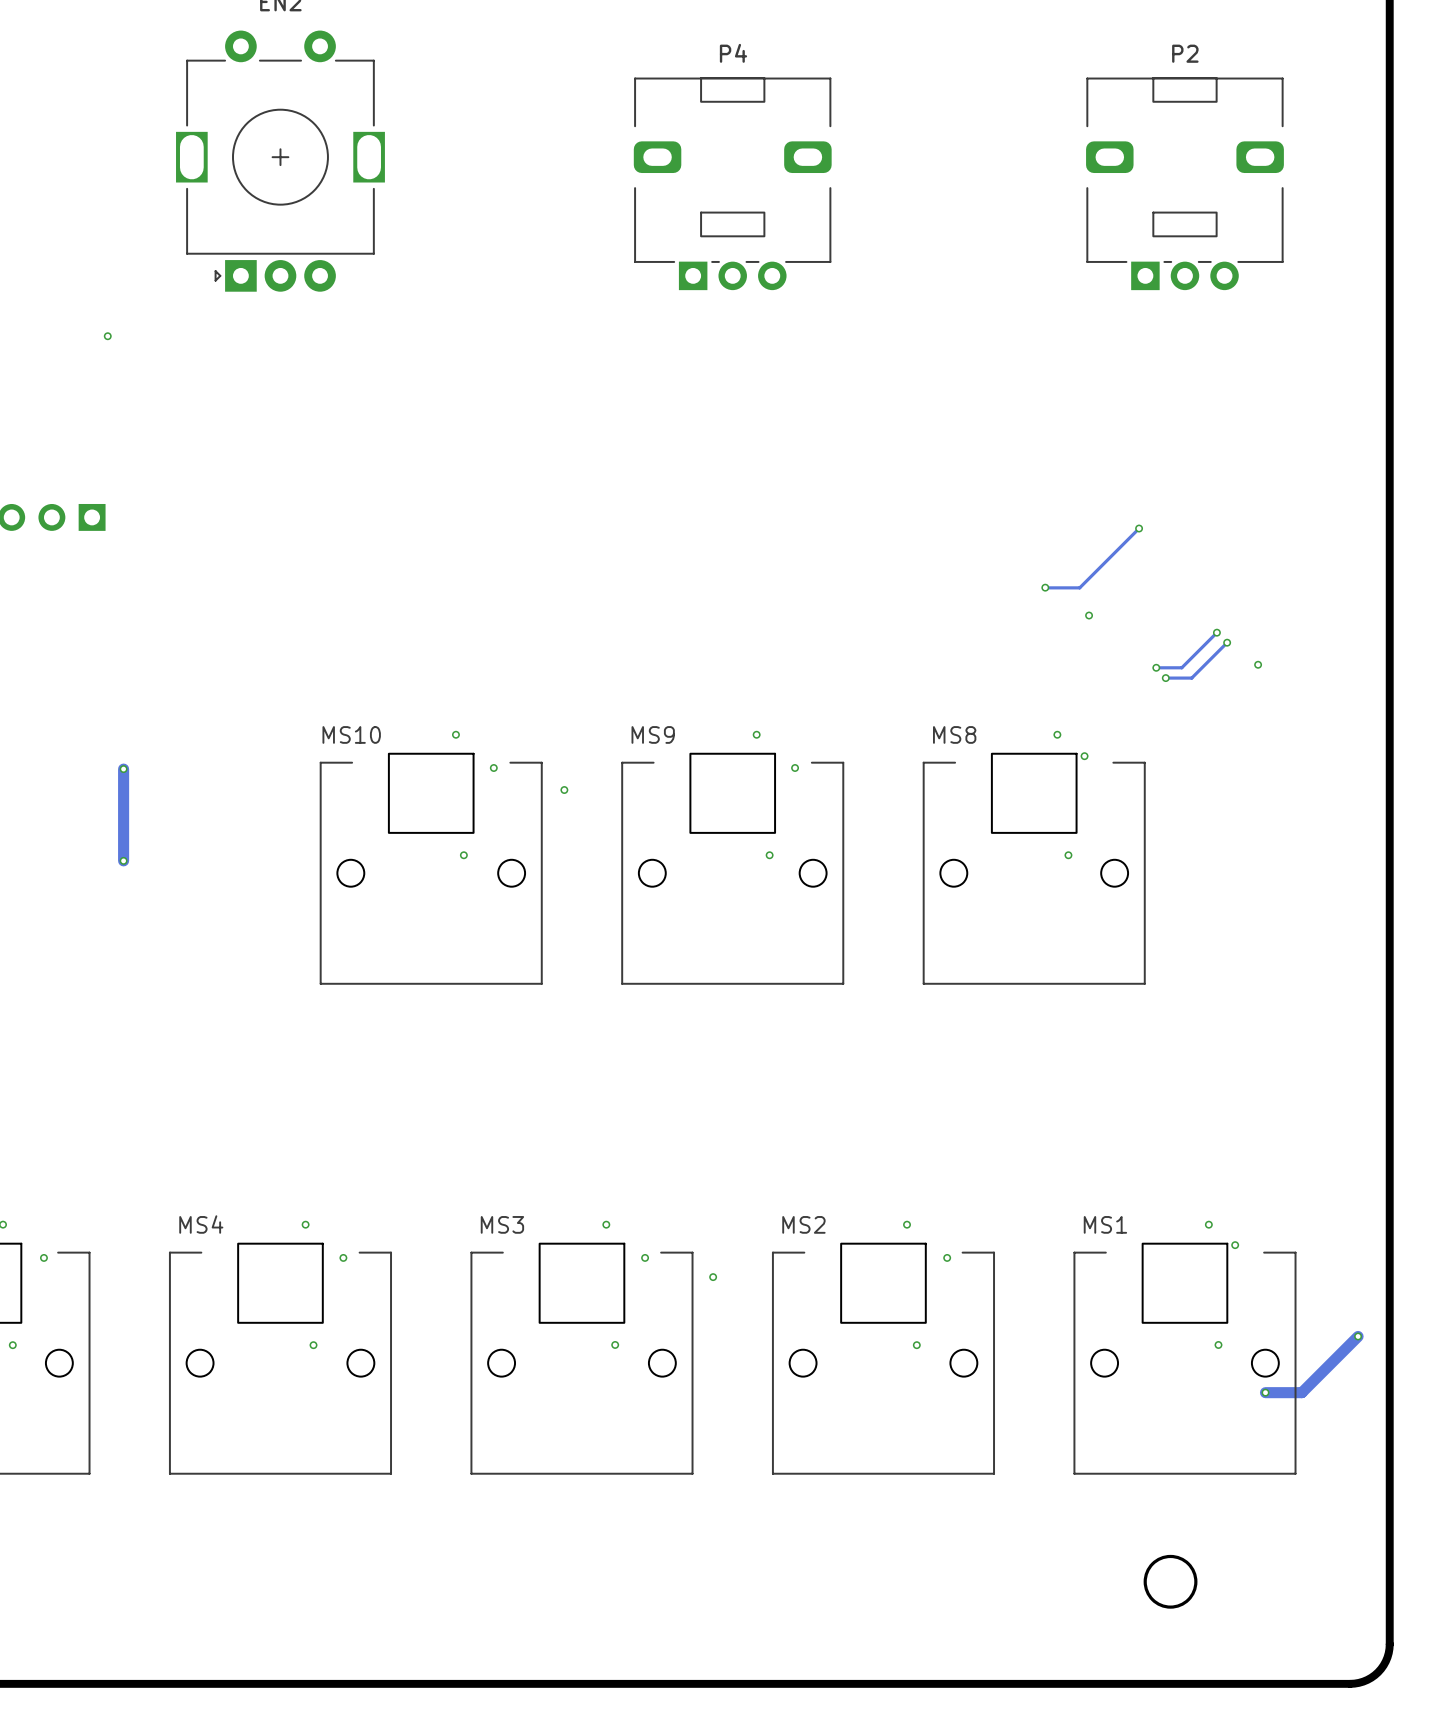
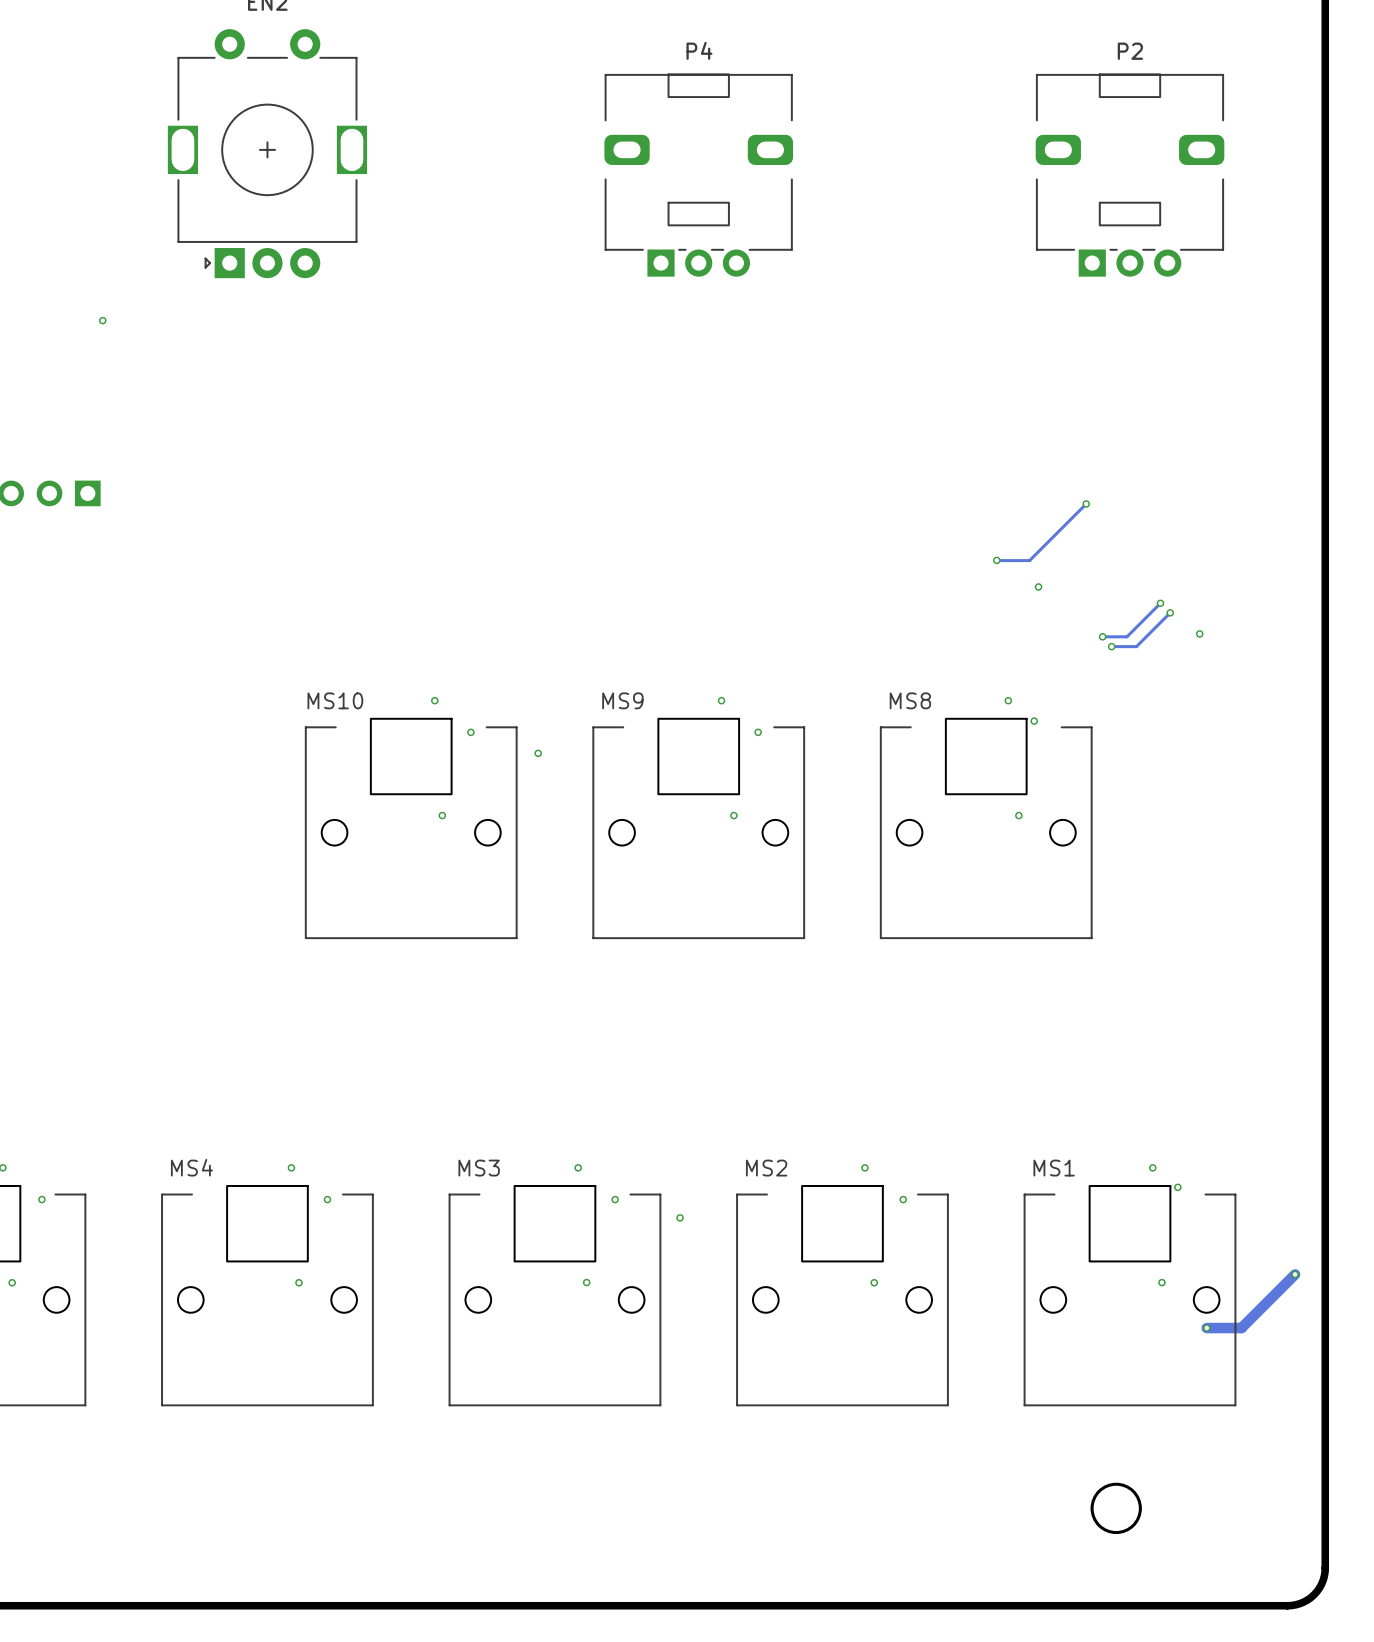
track: (123, 769) (123, 860) -> none
via: (123, 769) -> none
via: (123, 860) -> none

